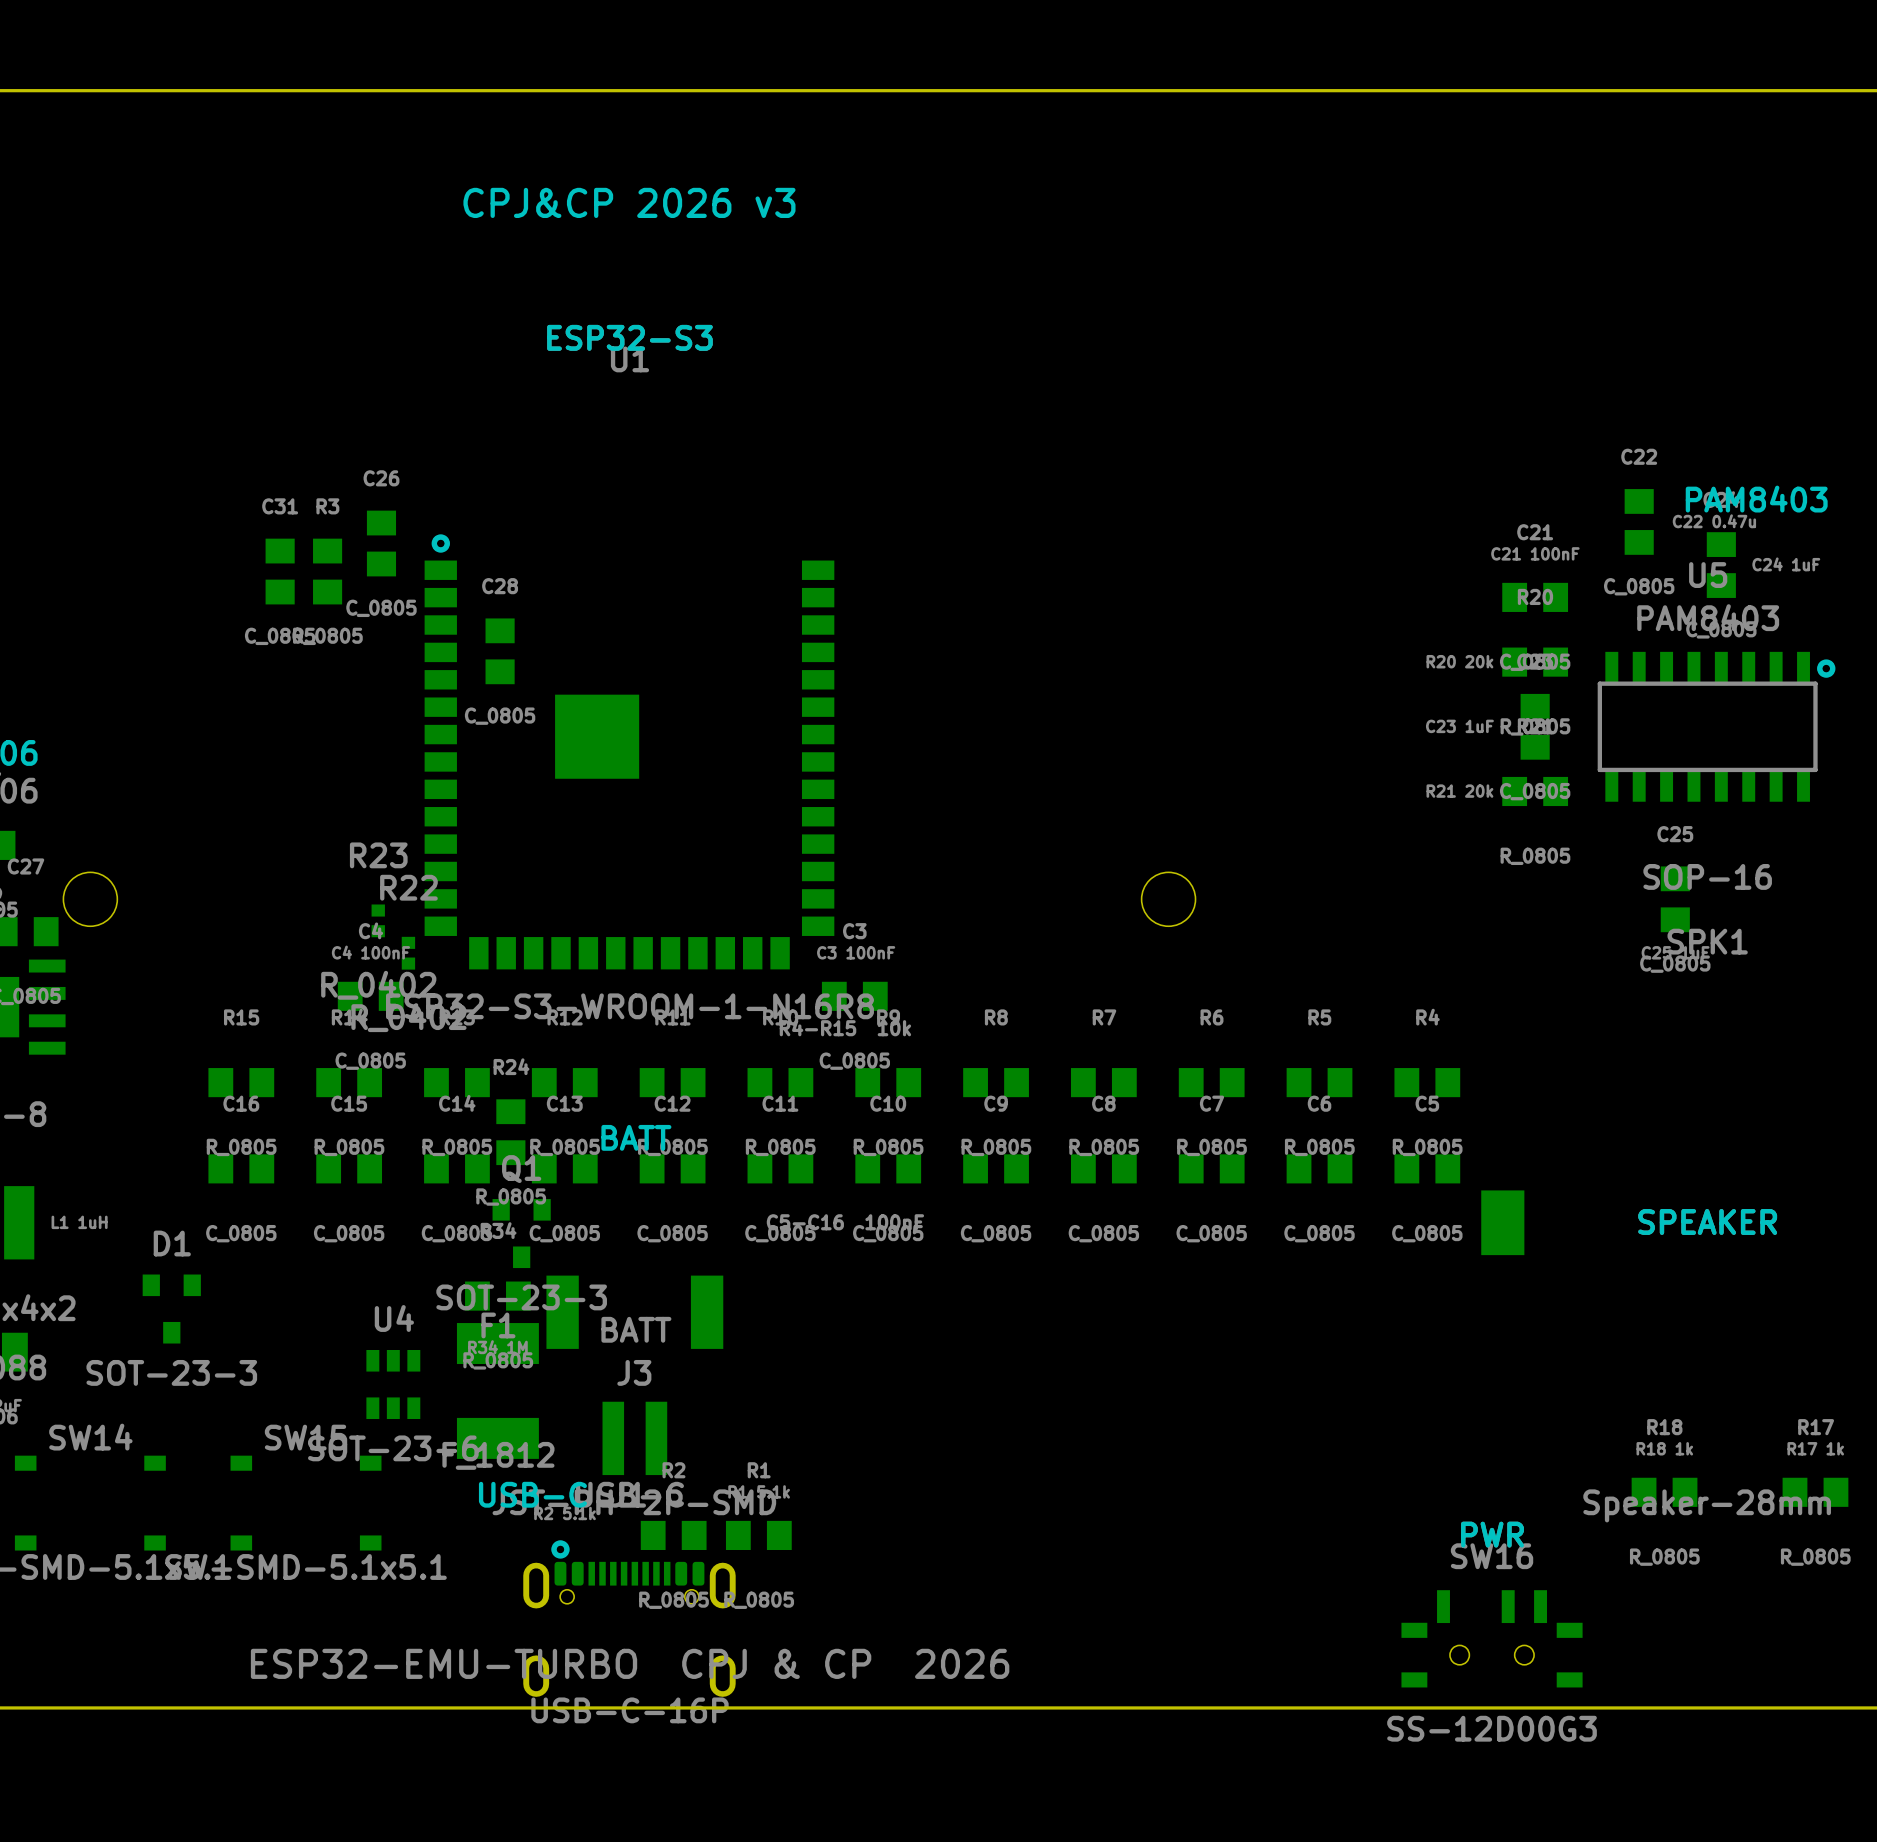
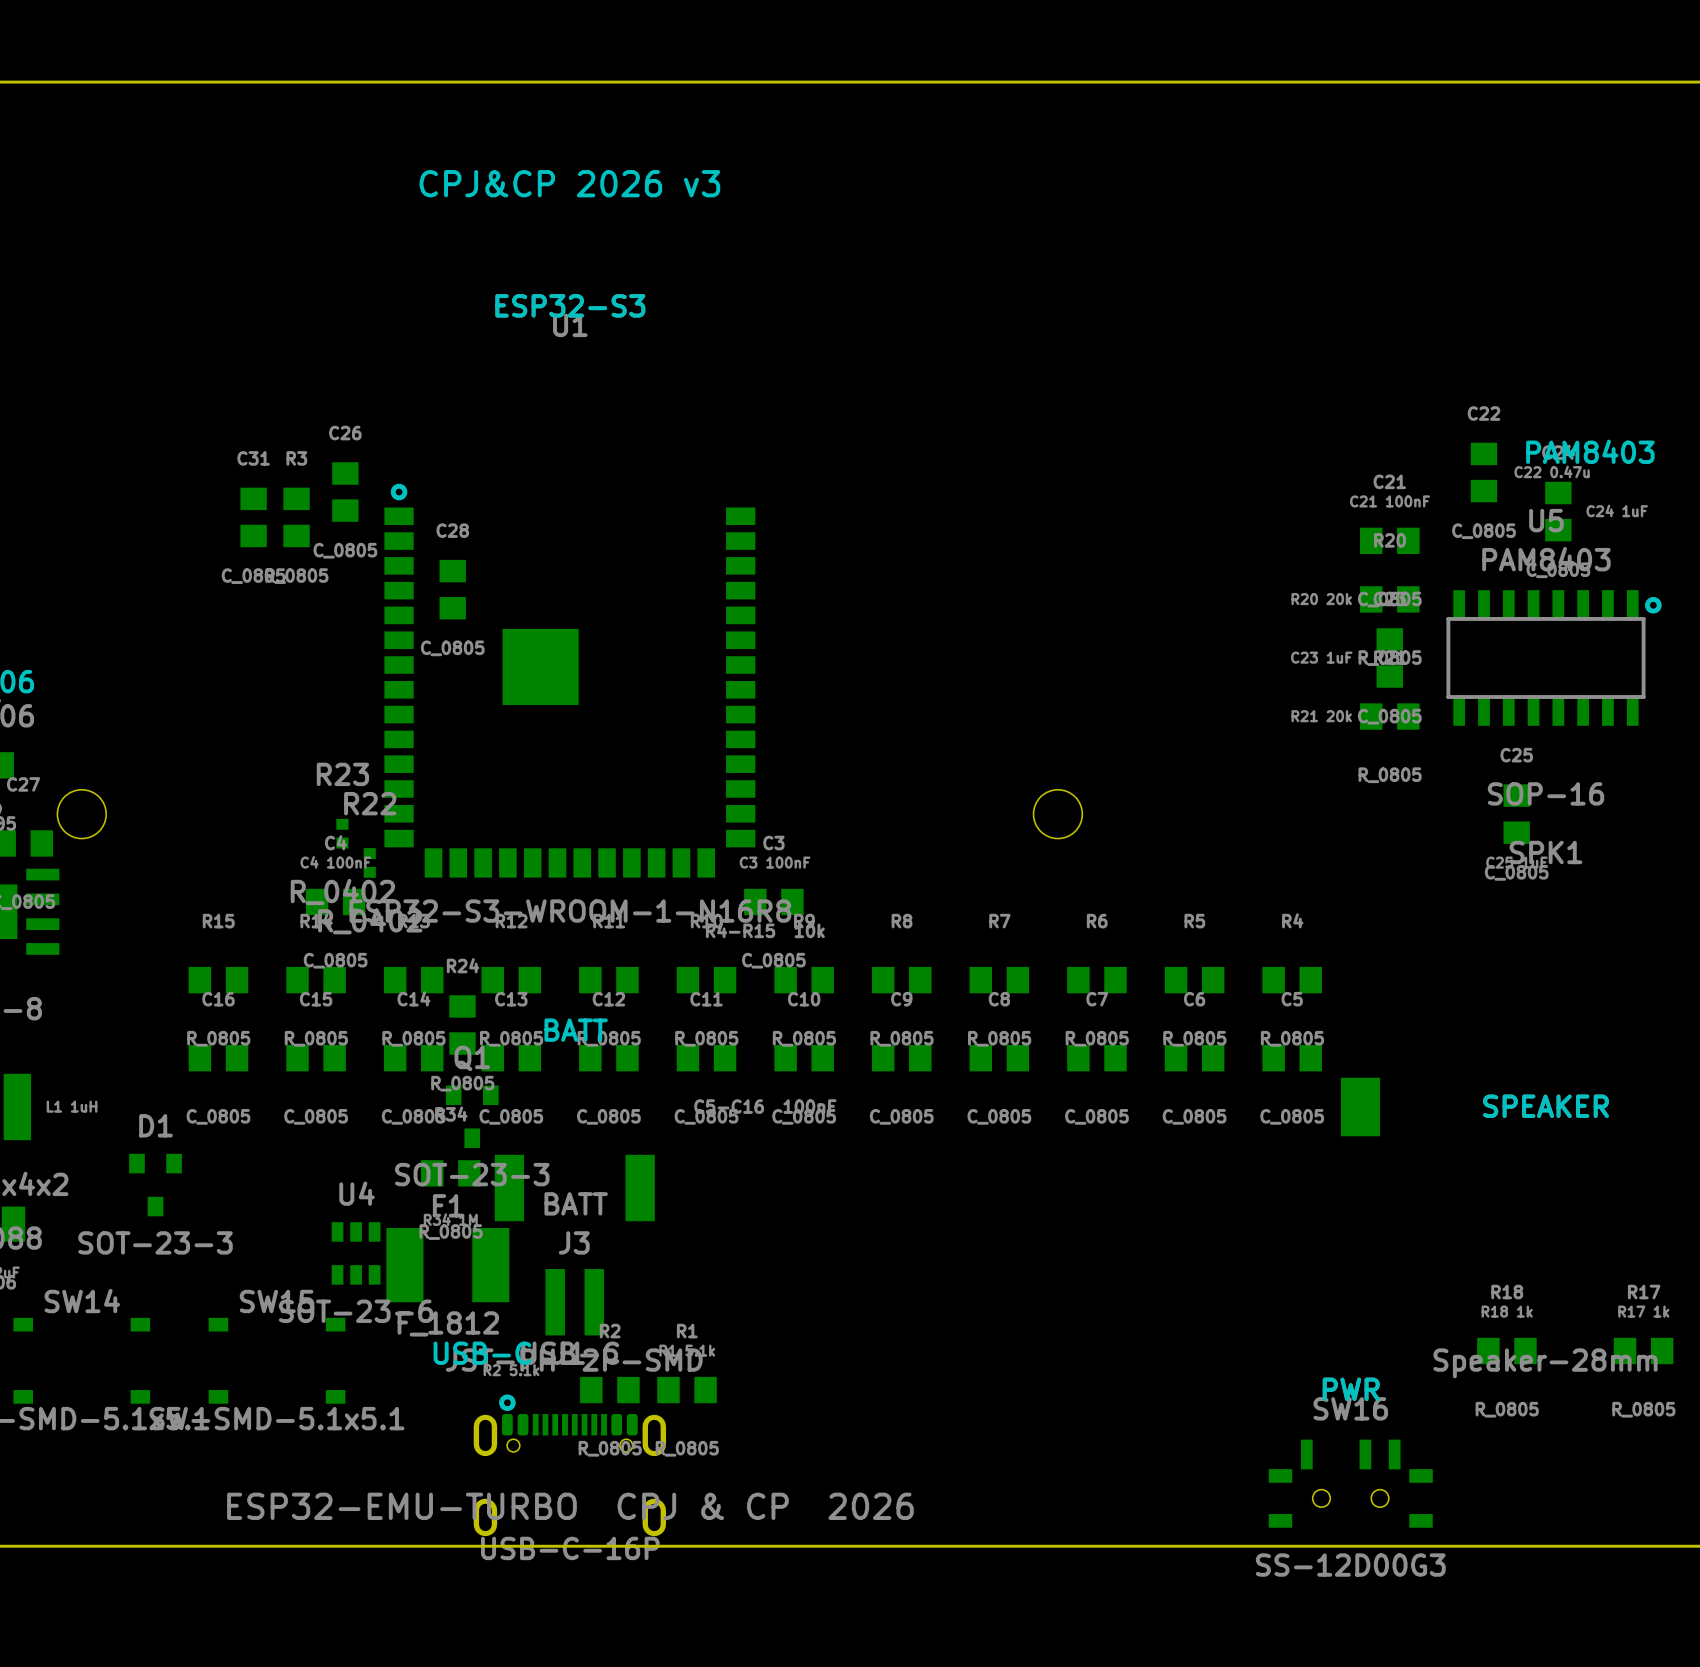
F1 rotation: 0° (497, 1390) -> 90° clockwise (447, 1265)

